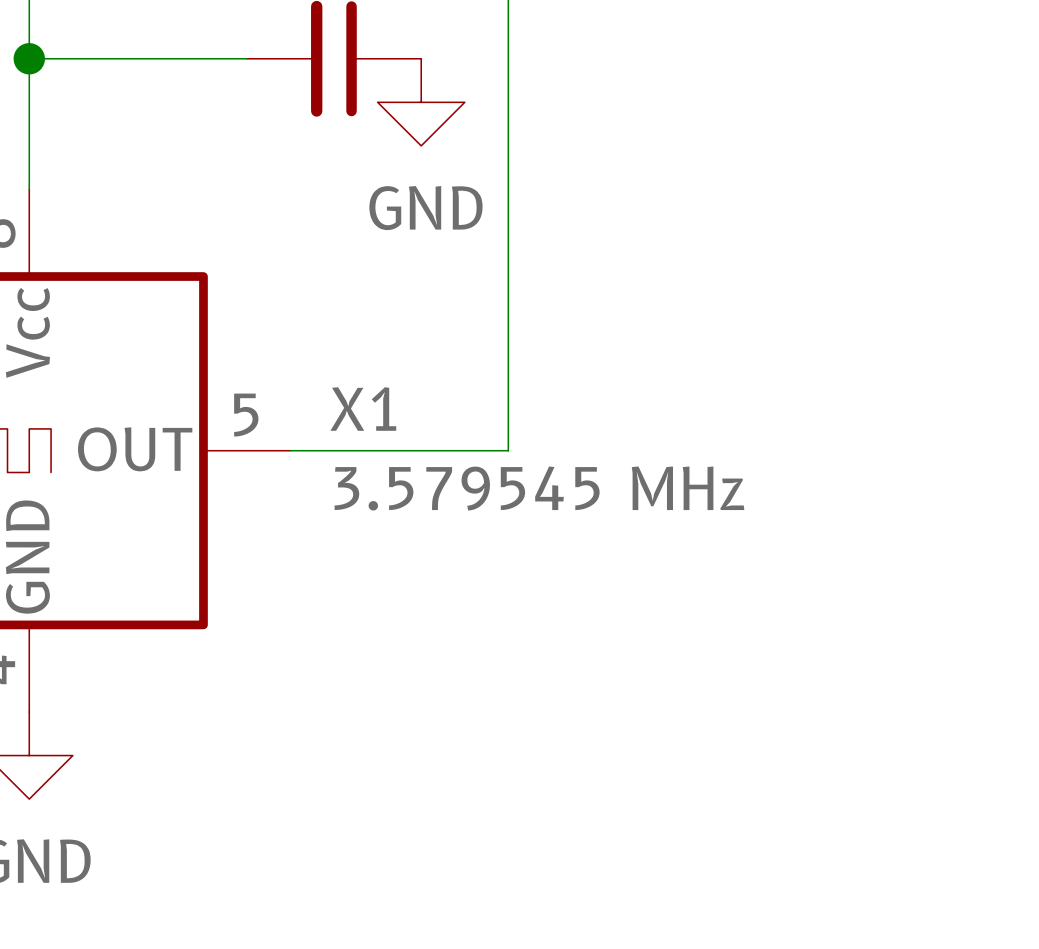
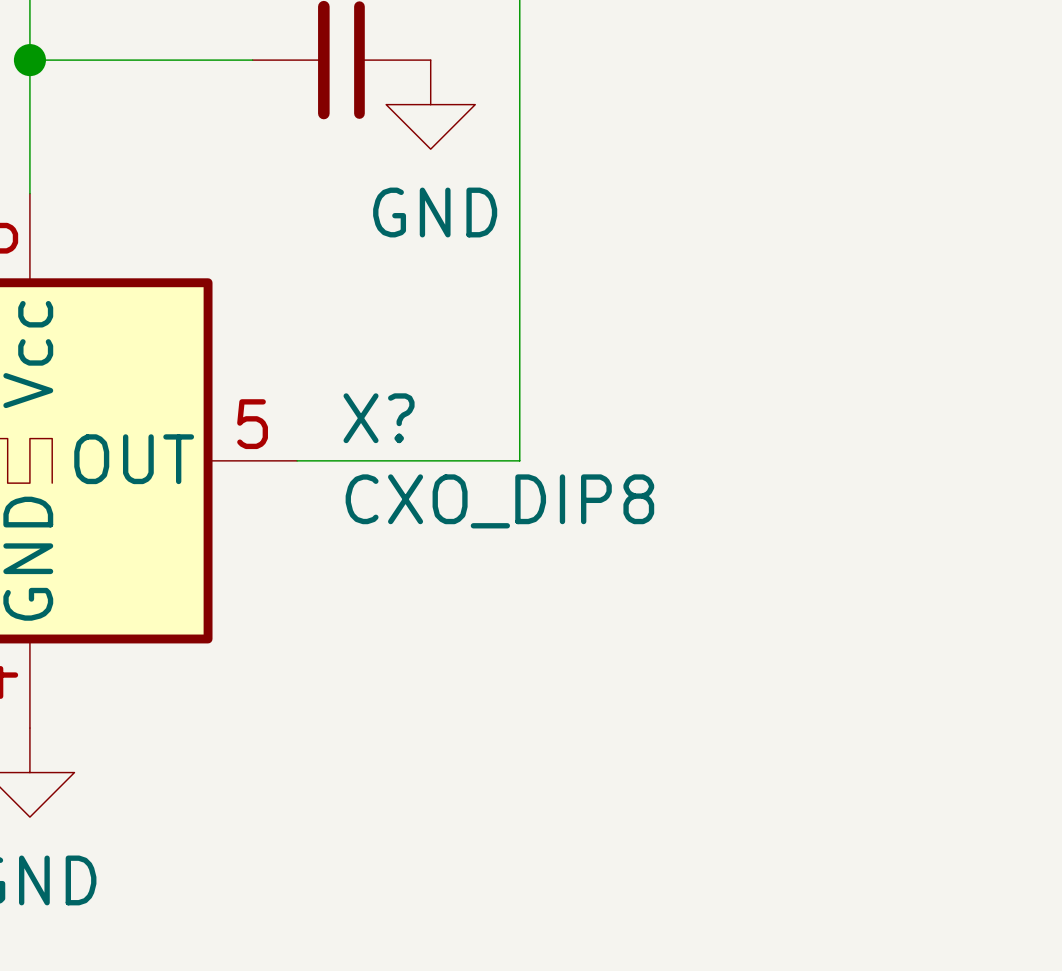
X1 name: X1 (363, 409) -> X? (379, 418)
X1 value: 3.579545 MHz (539, 488) -> CXO_DIP8 (499, 501)

